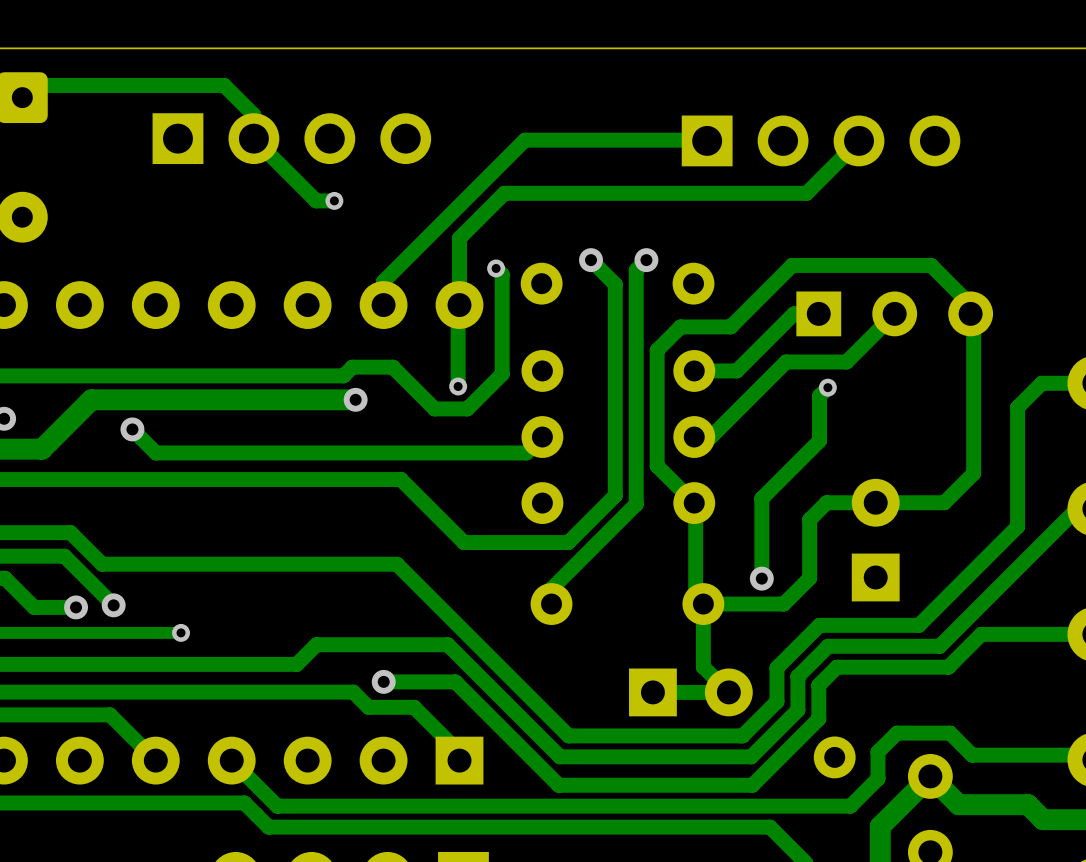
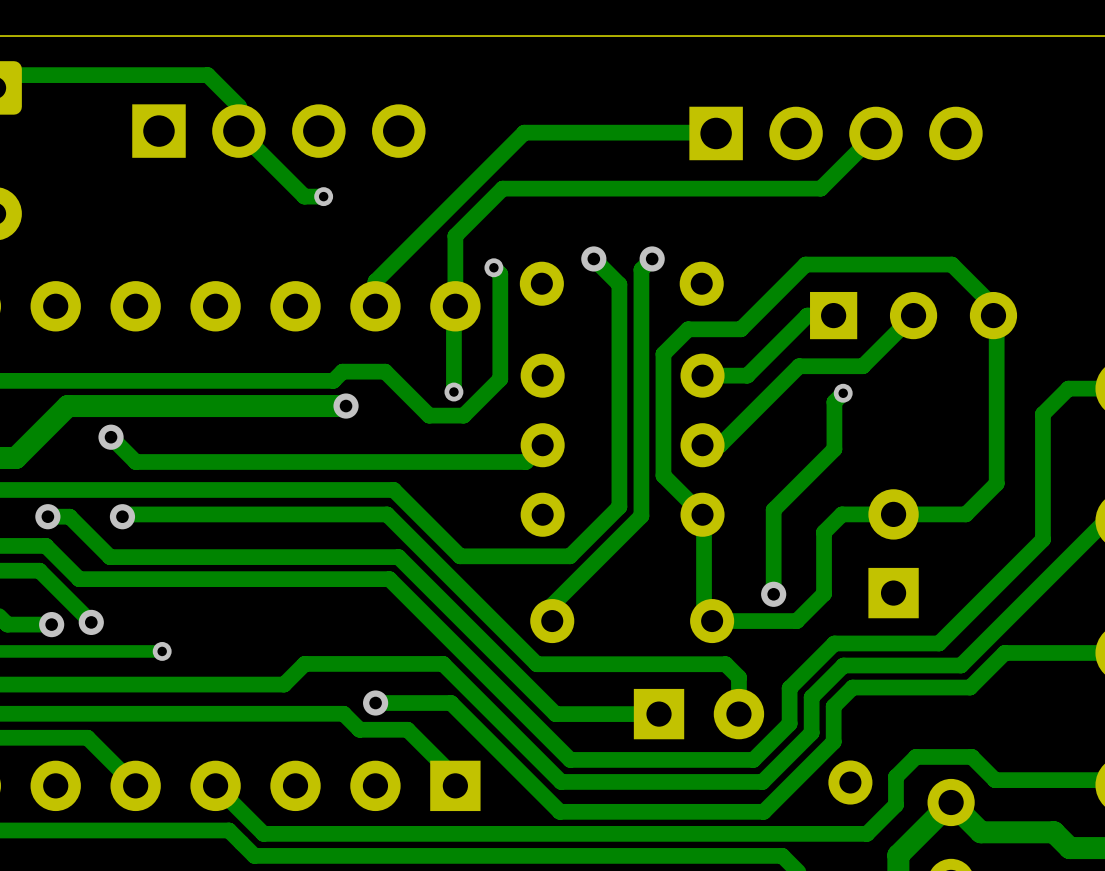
via: none -> (47, 516)
track: none -> (122, 516) (124, 514) (387, 514) (536, 664) (725, 664) (738, 677) (738, 714)
via: none -> (122, 516)
track: (703, 604) (703, 666) (728, 692) (652, 692) -> (47, 516) (69, 516) (110, 557) (398, 557) (555, 714) (659, 714)

